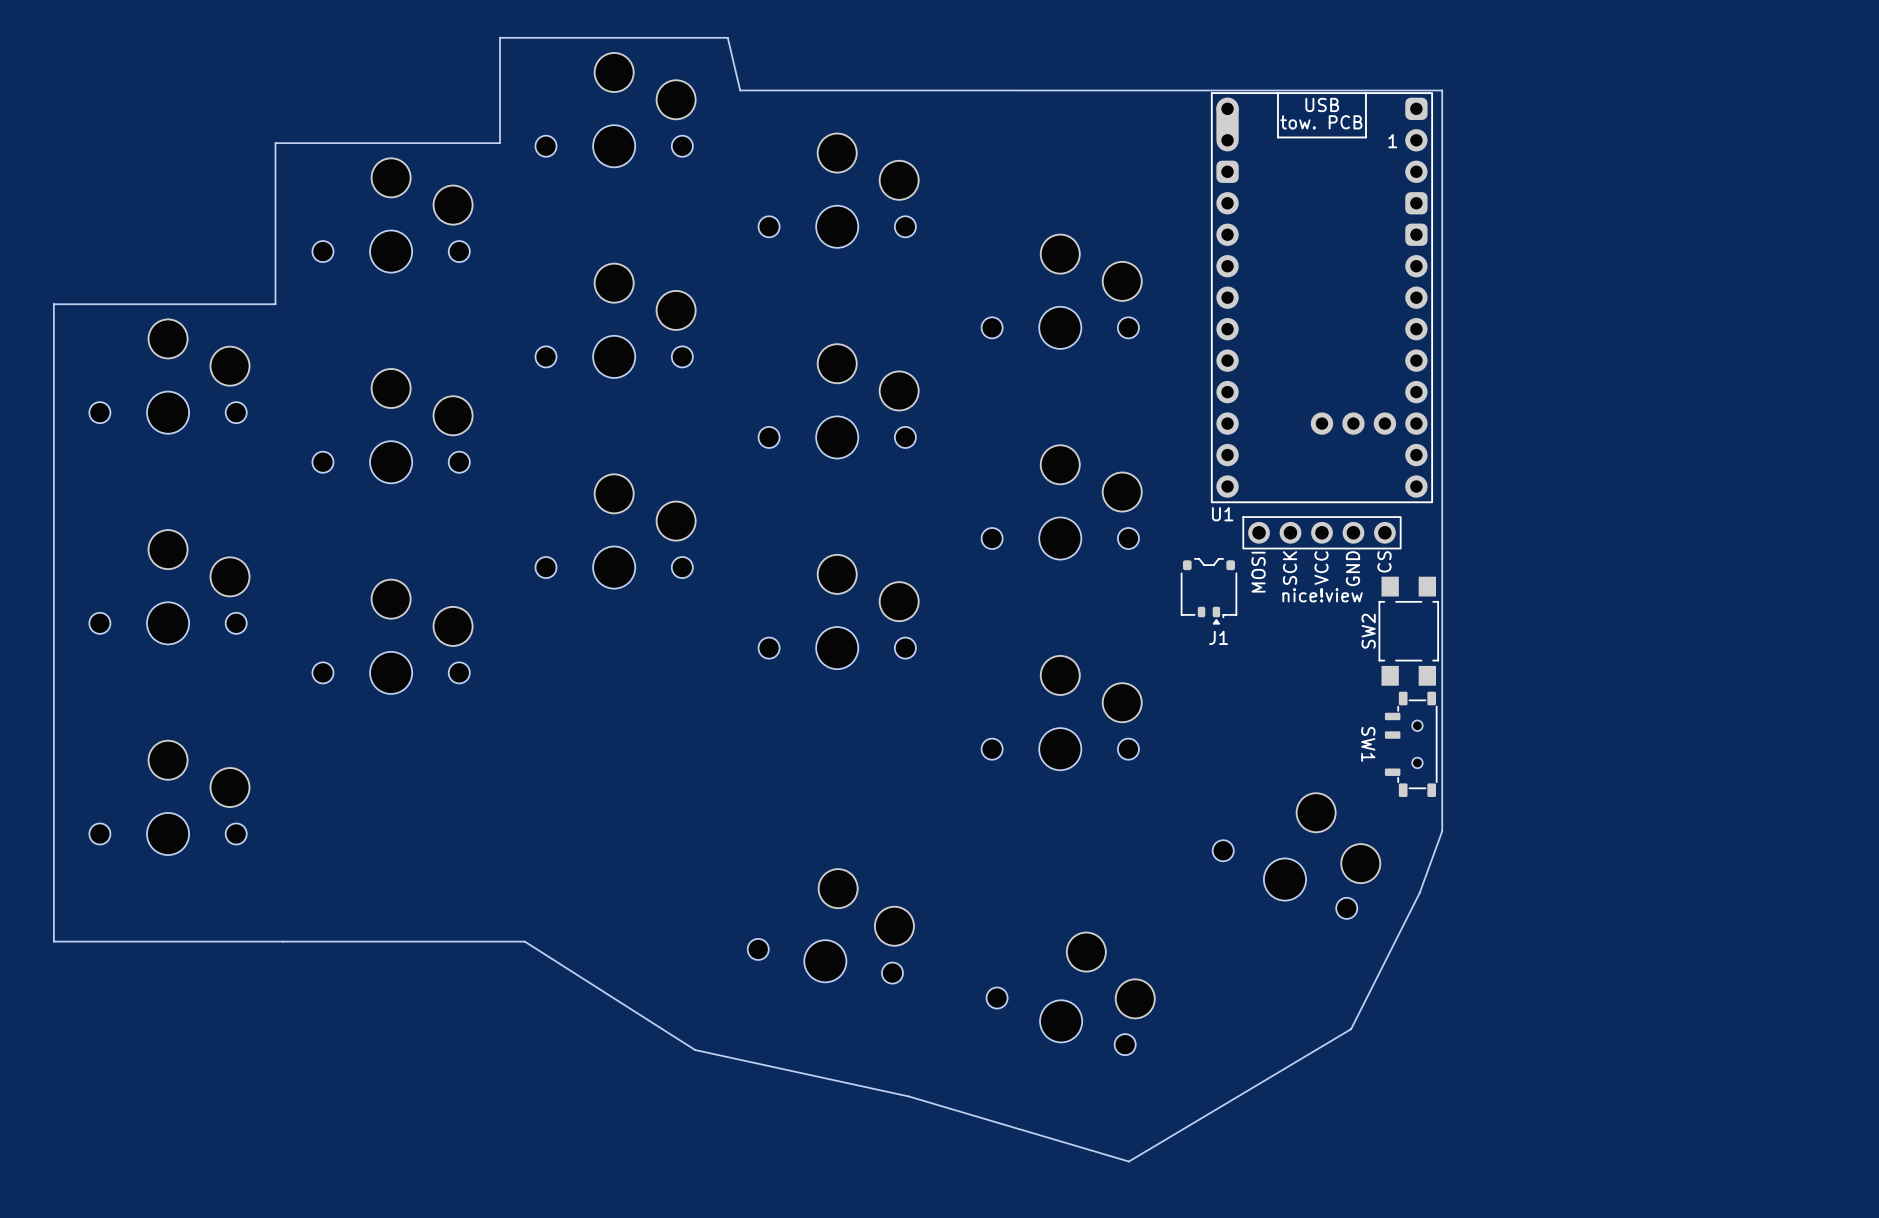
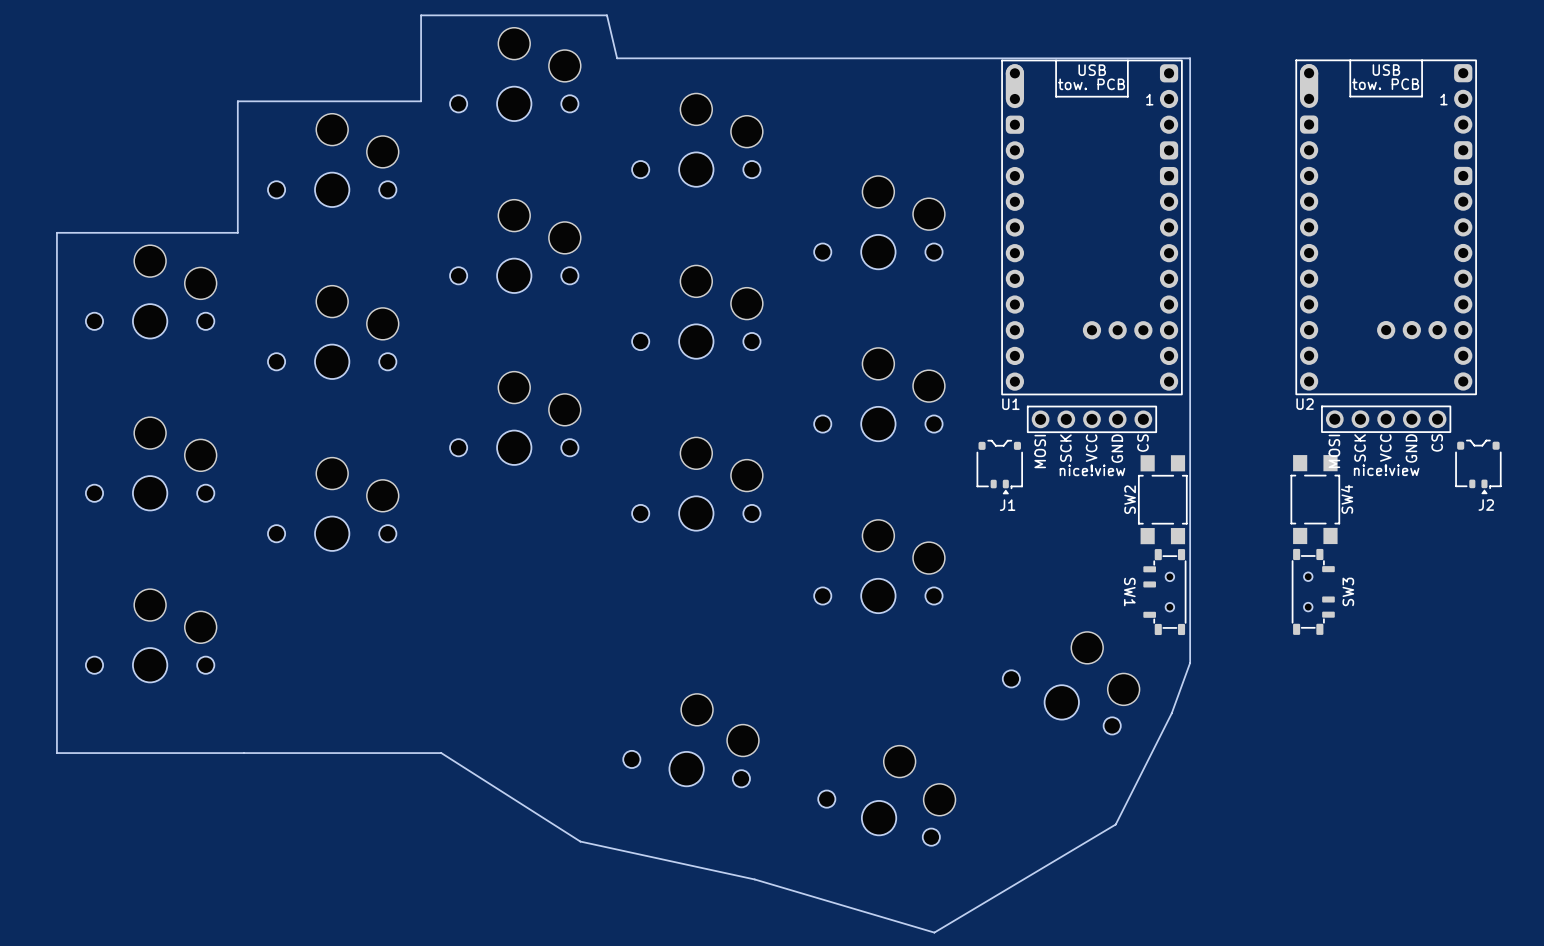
U2: none -> (1386, 227)
part: none -> nice!view (1386, 419)
J2: none -> (1478, 467)
SW4: none -> (1315, 499)
SW3: none -> (1313, 591)

